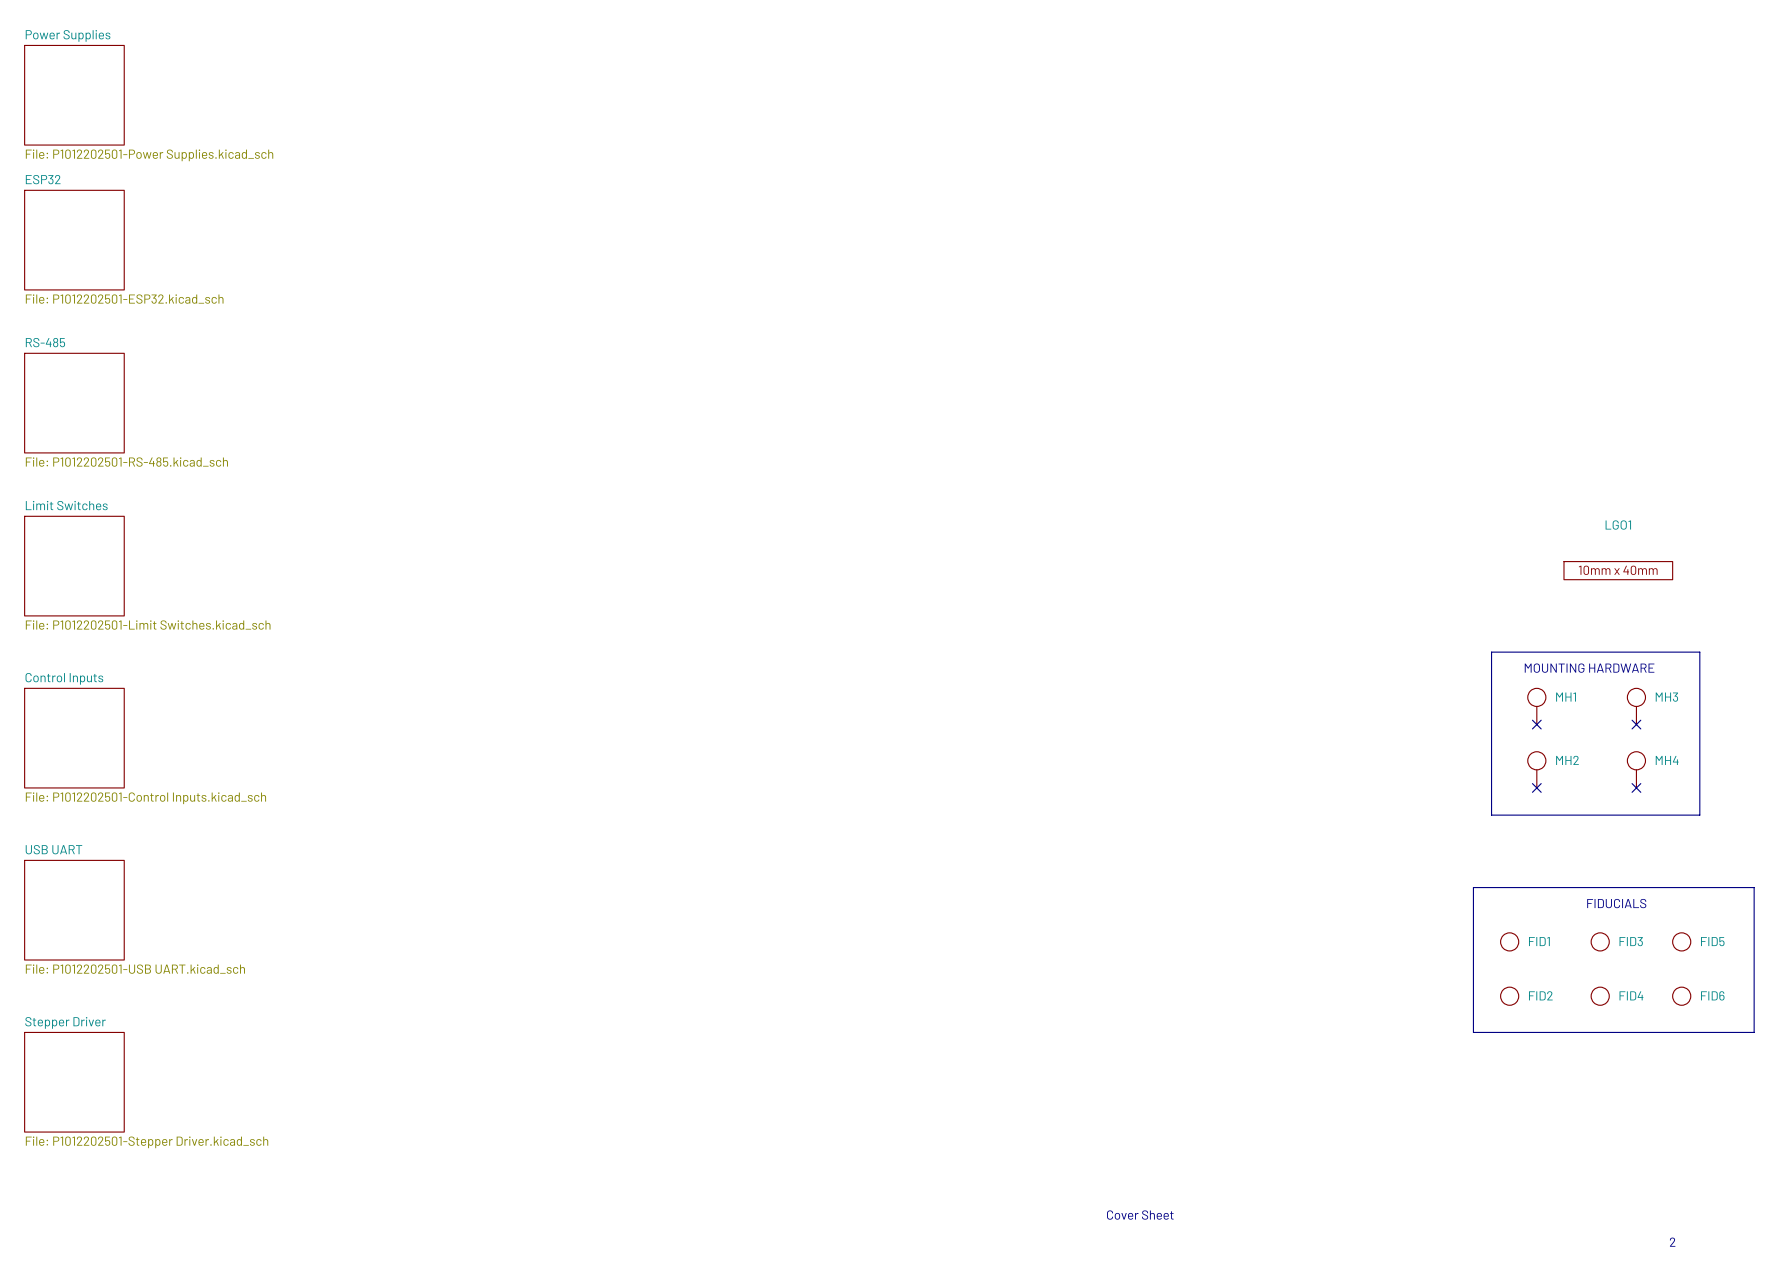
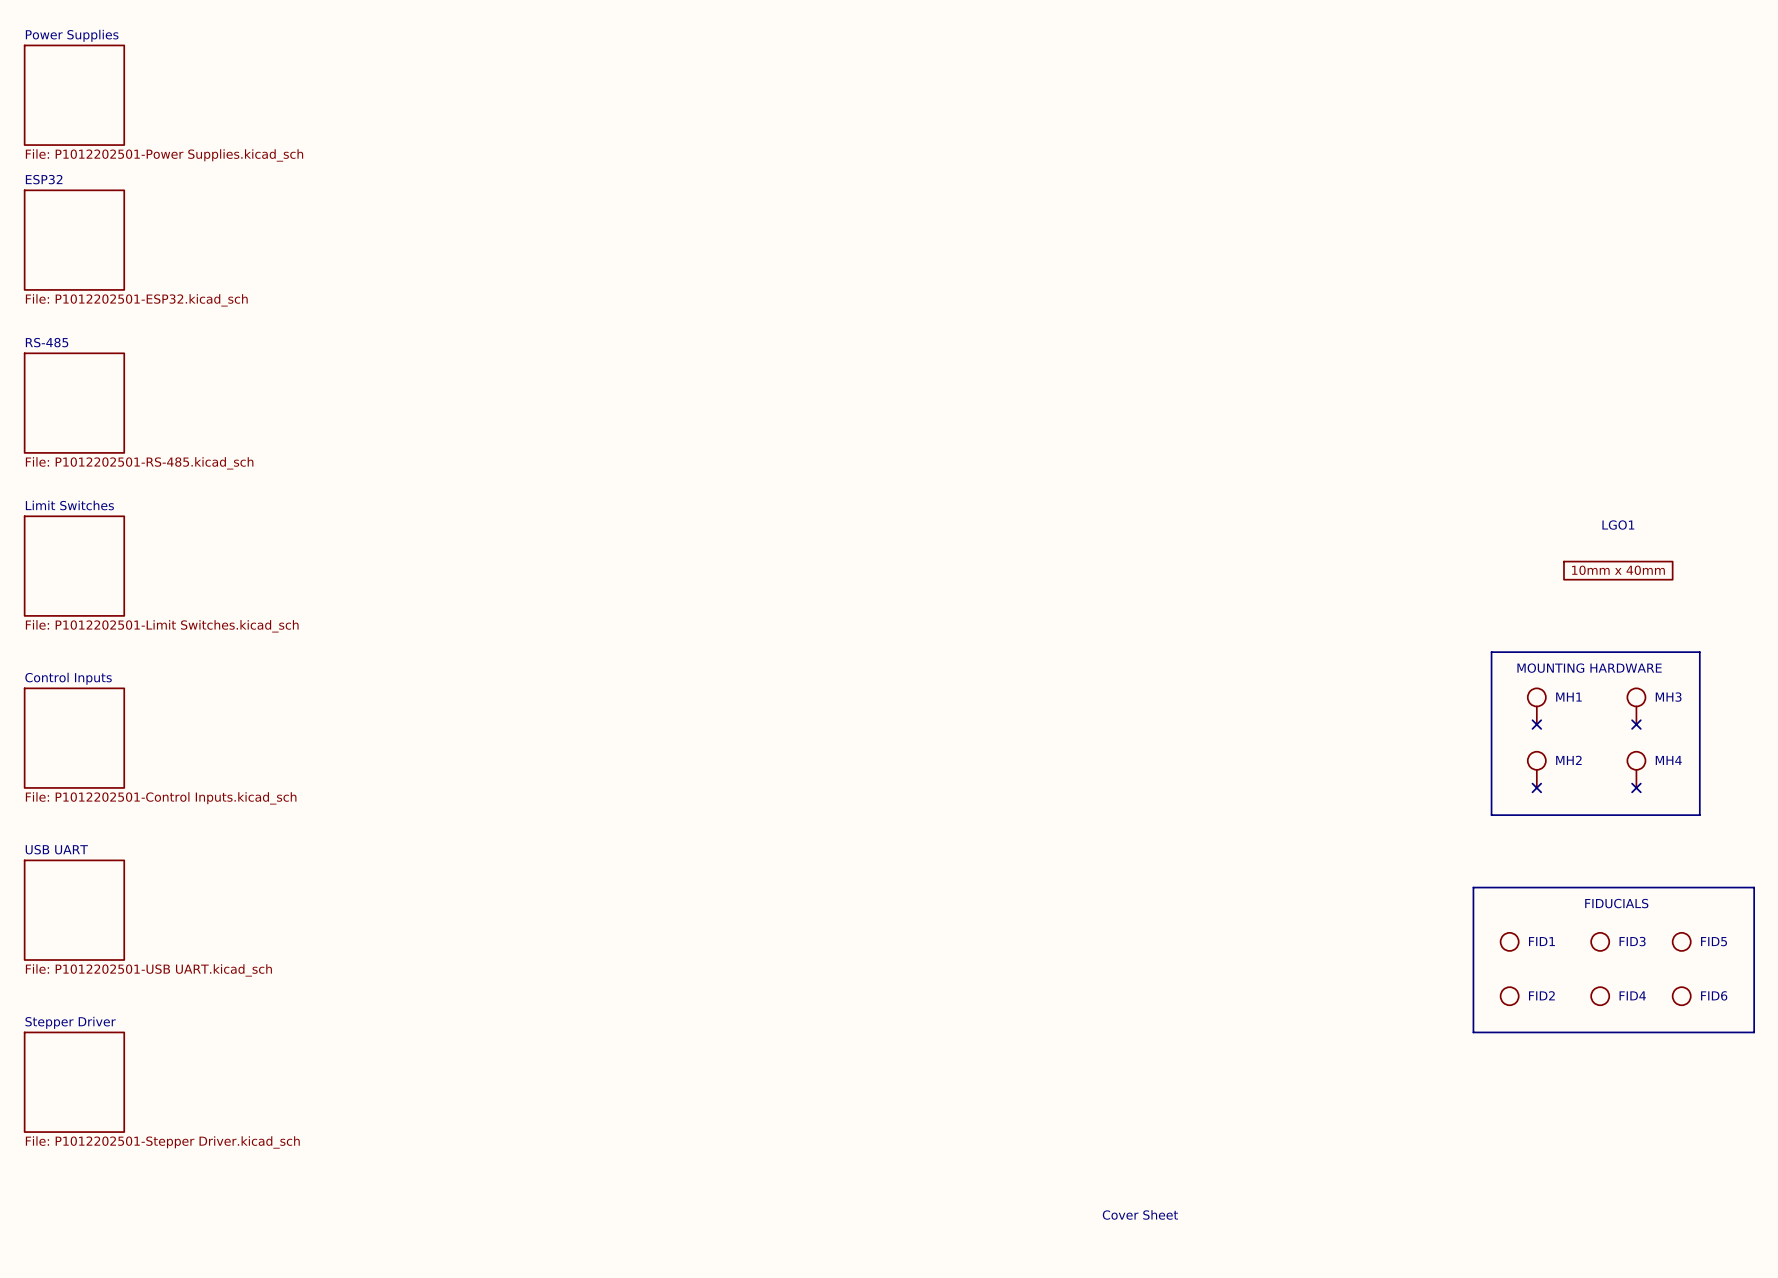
text: 2 (1672, 1242) -> none

